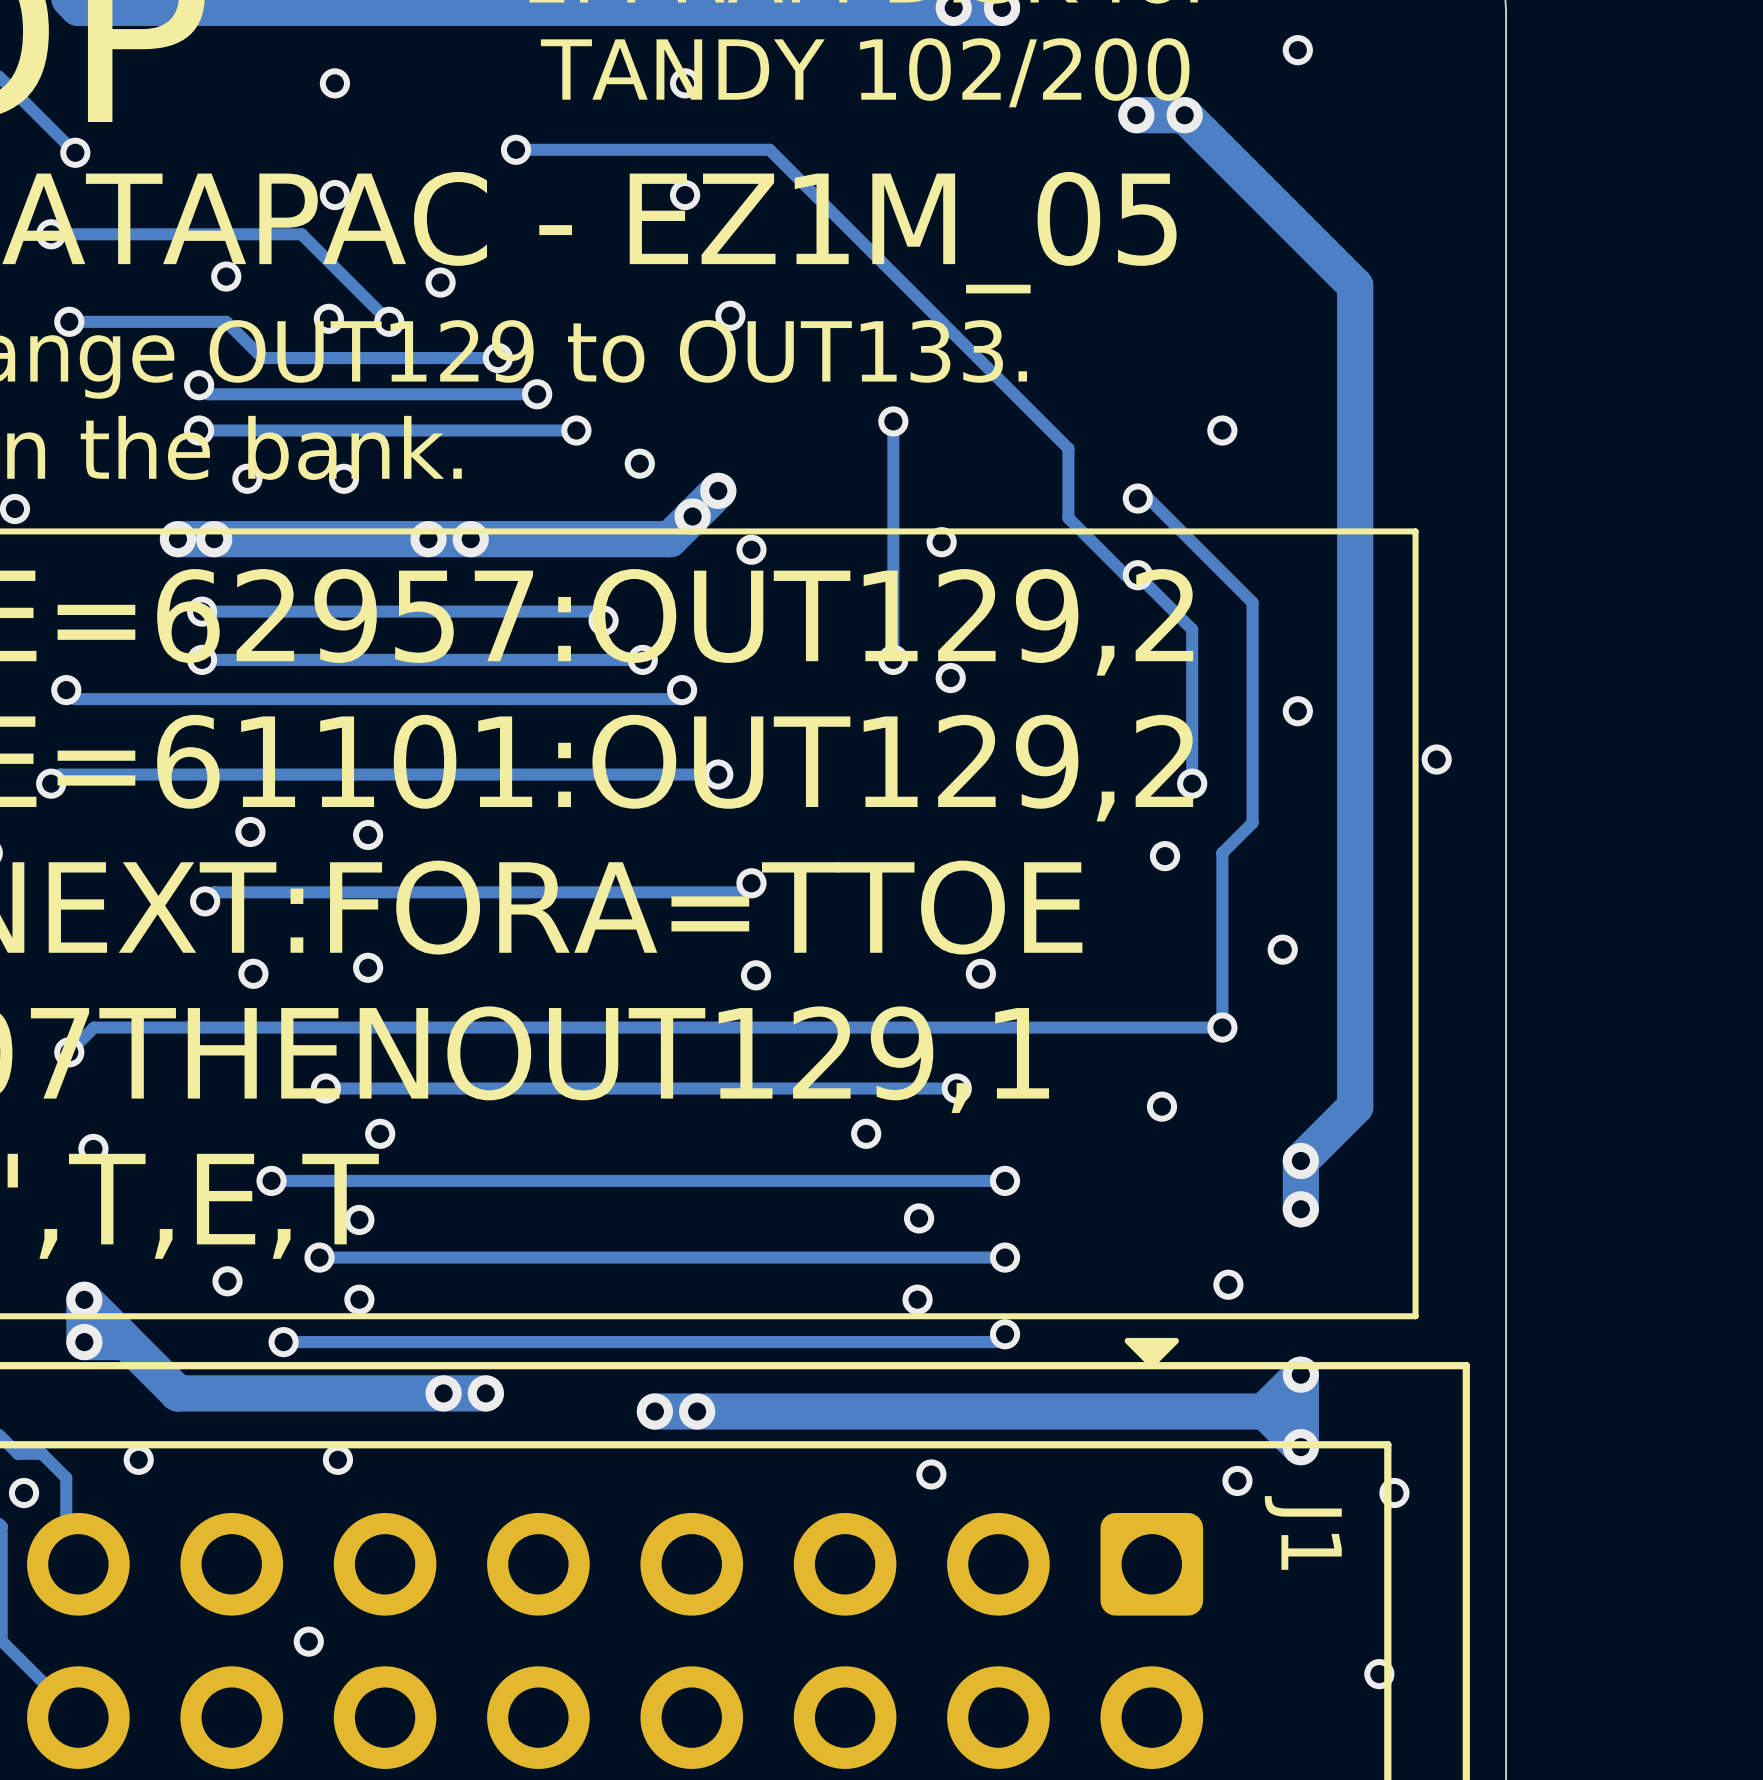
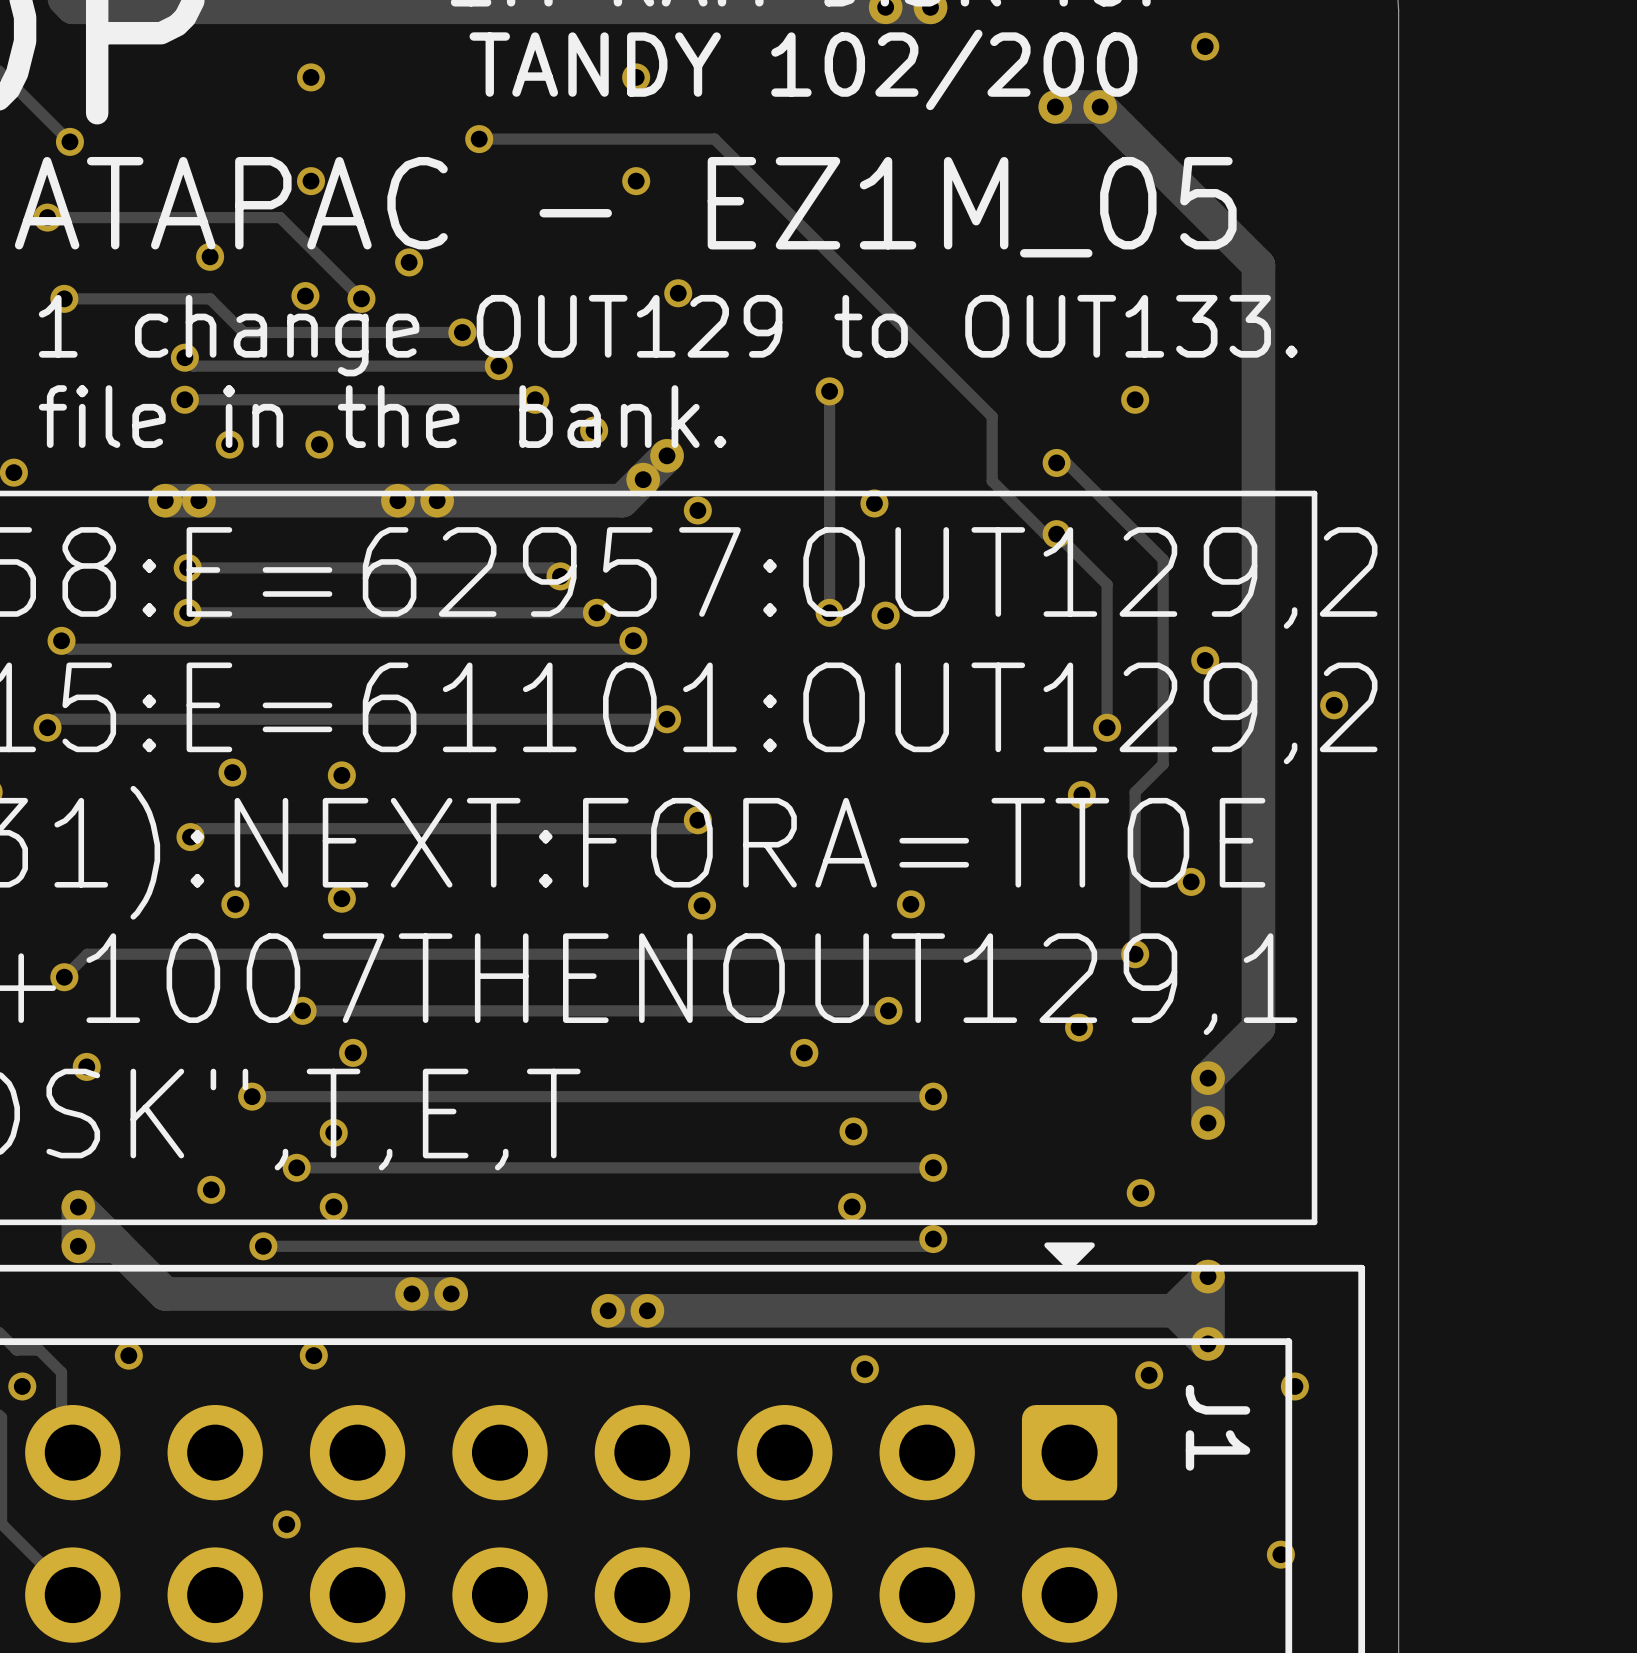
via position: (950, 678) -> (885, 615)

